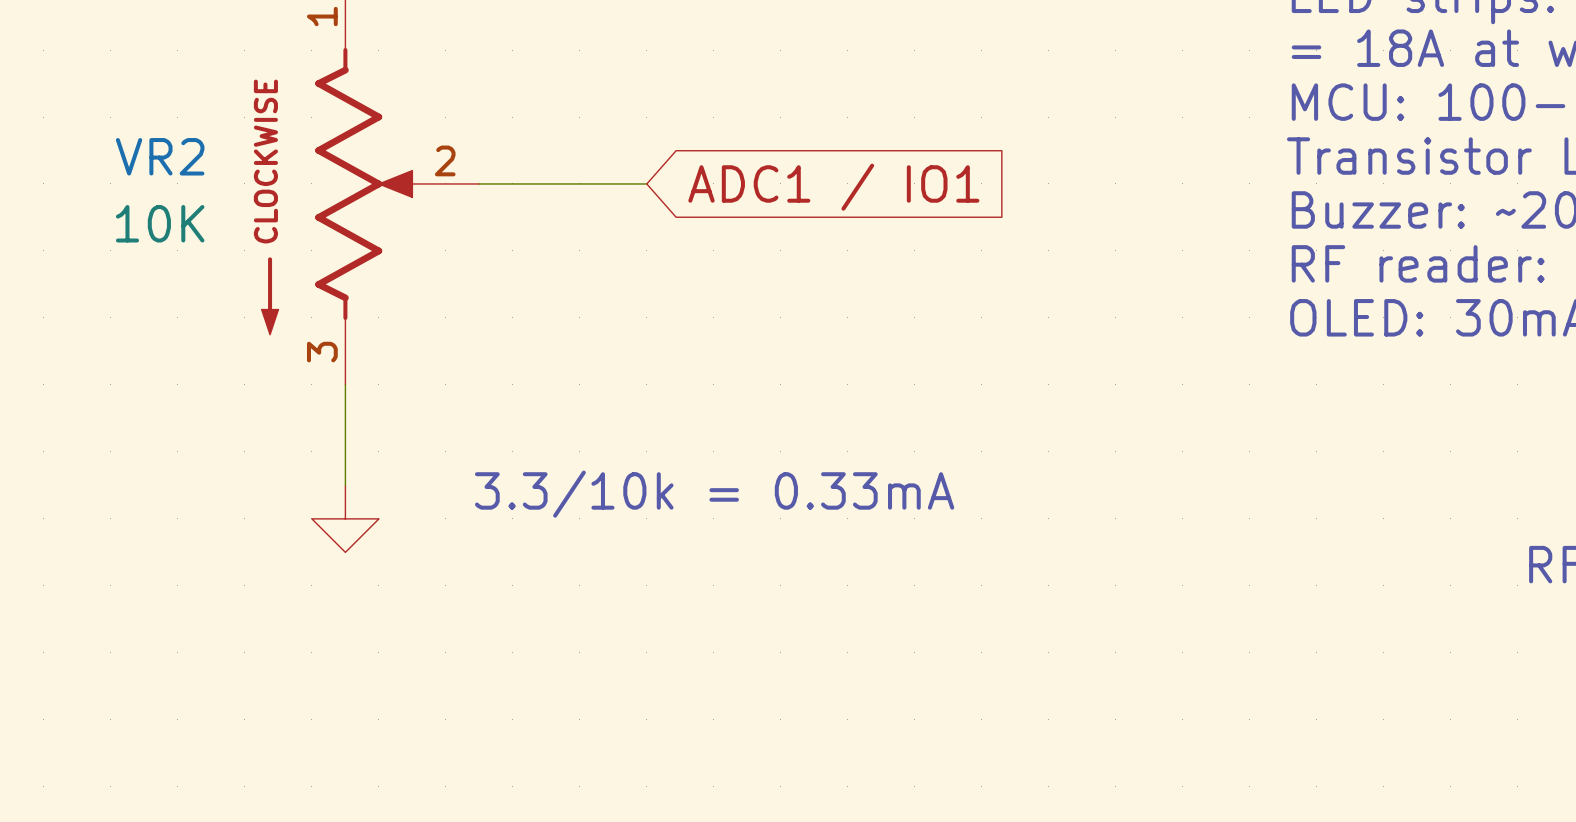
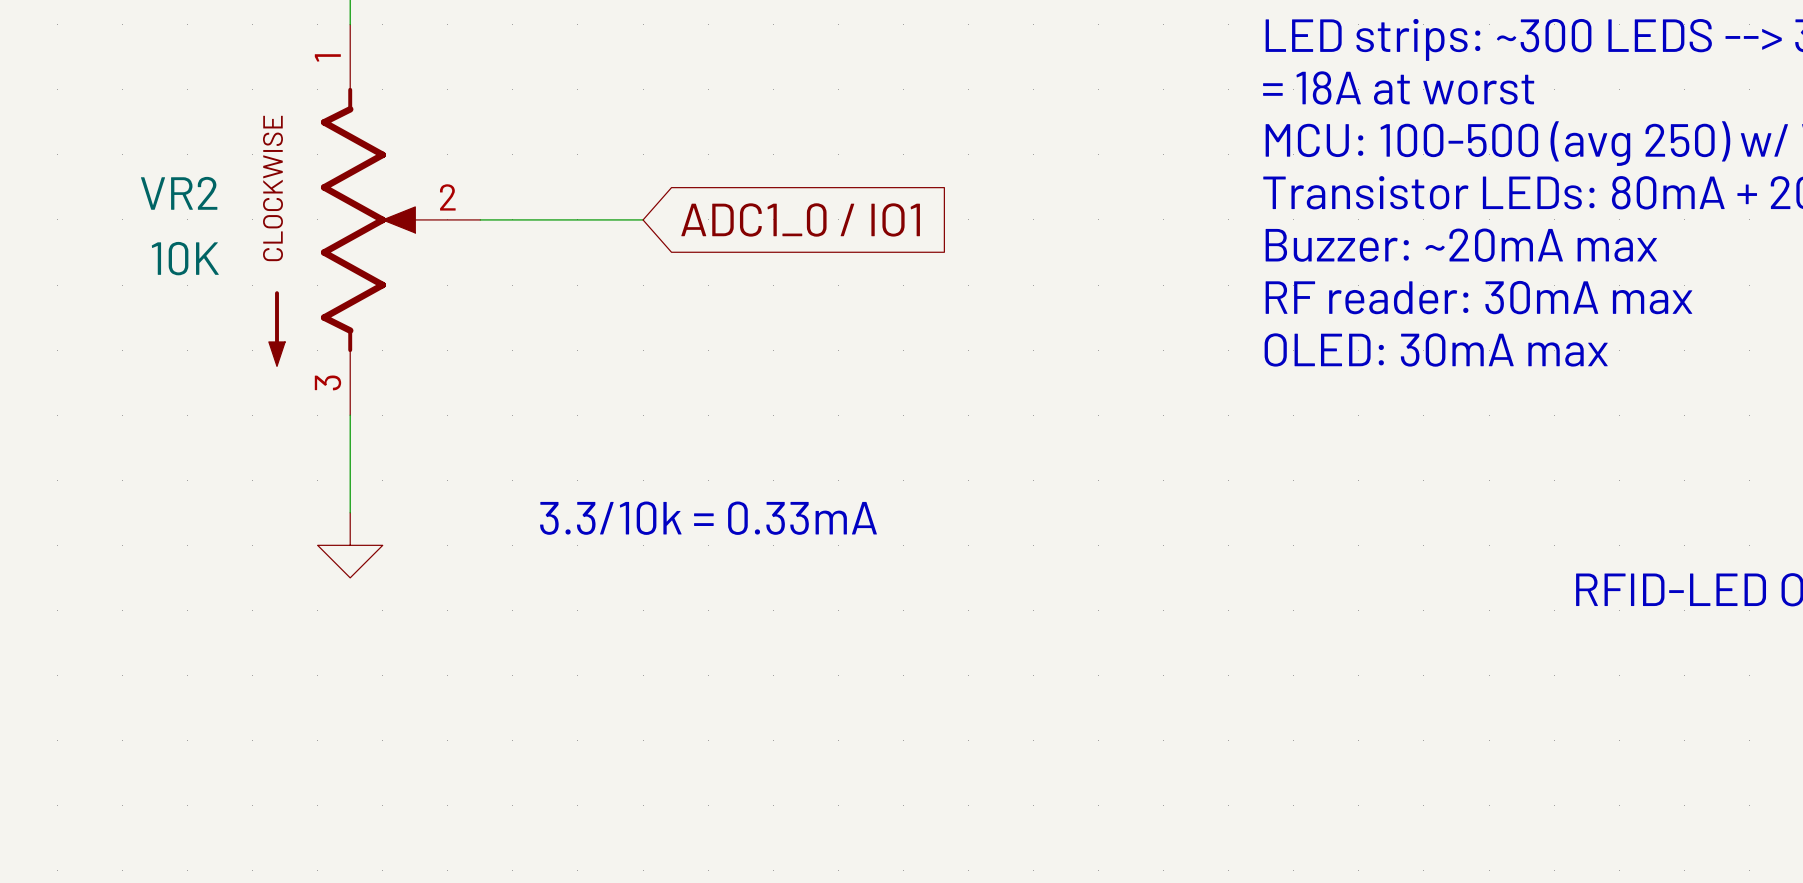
global label: ADC1 / IO1 (833, 187) -> ADC1_0 / IO1 (800, 219)

